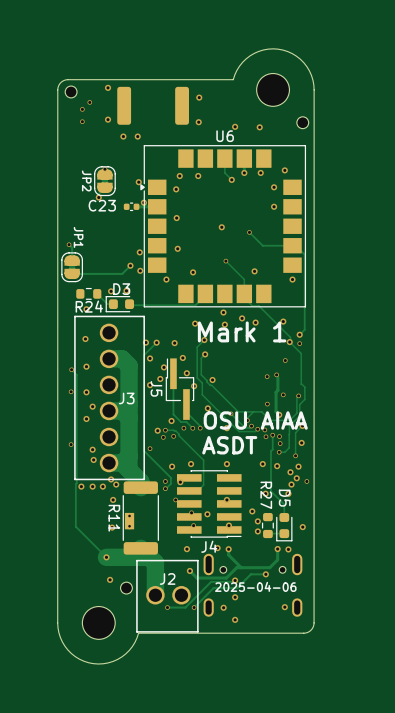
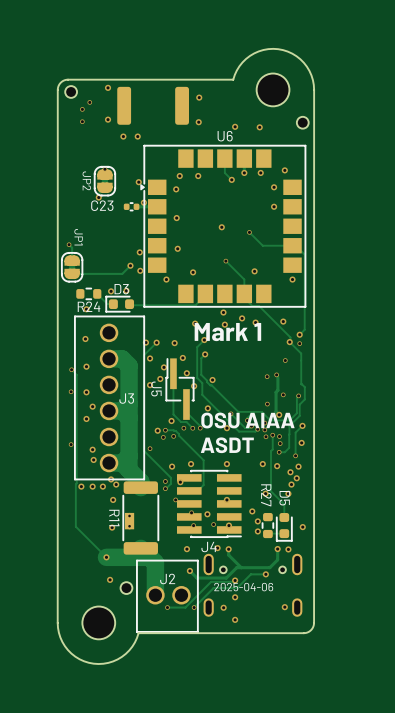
via: (306, 481) -> none
via: none -> (213, 524)

